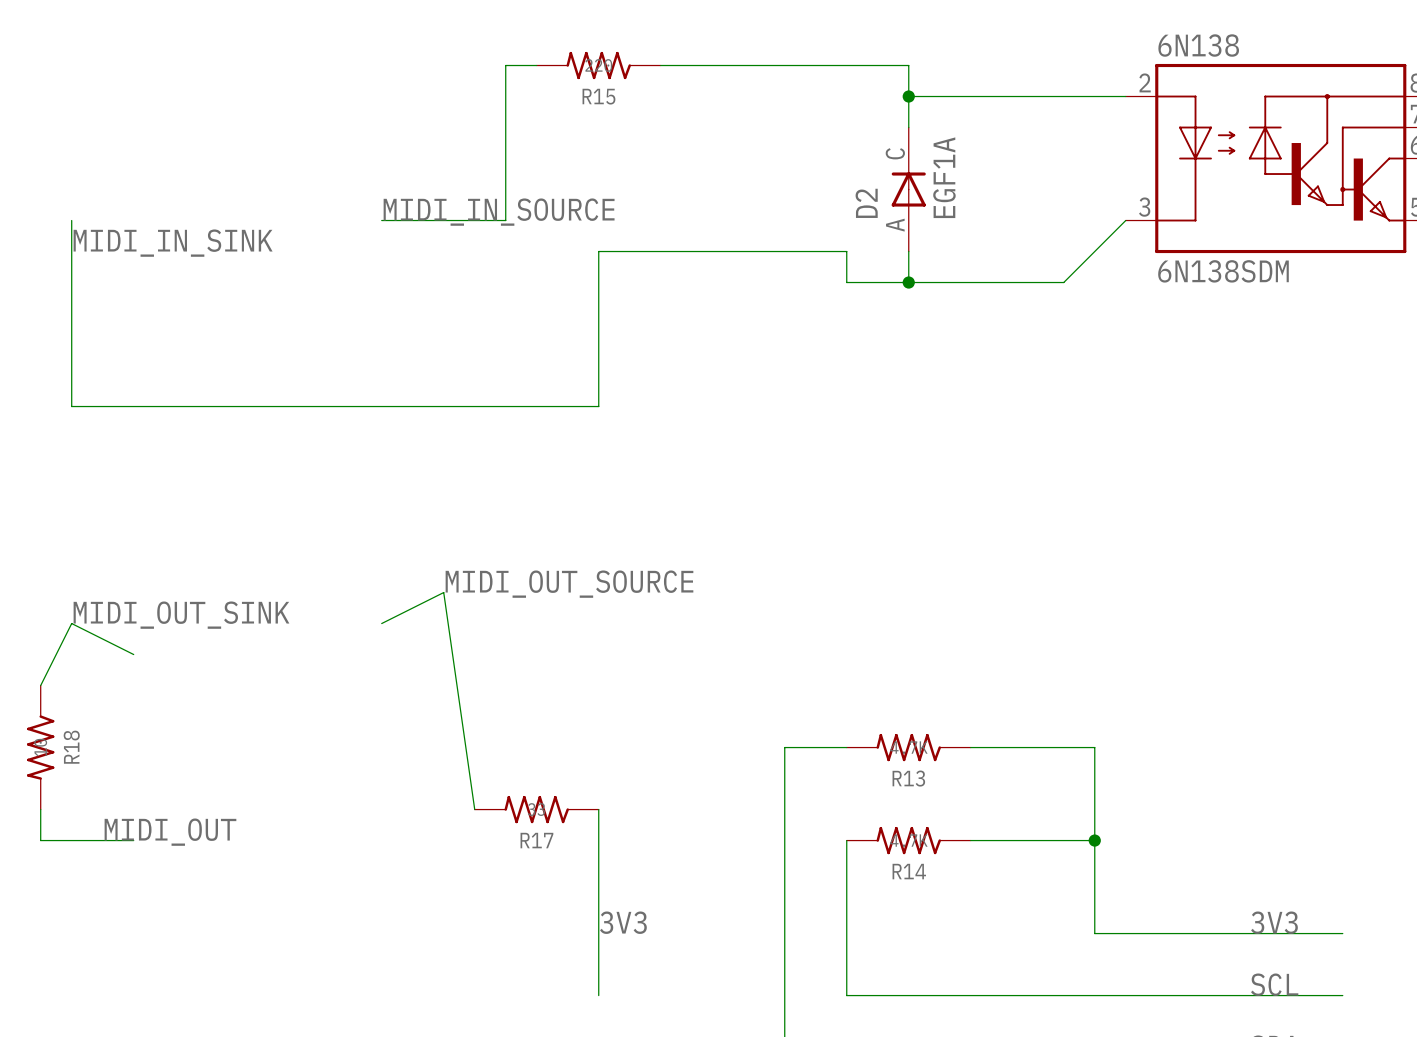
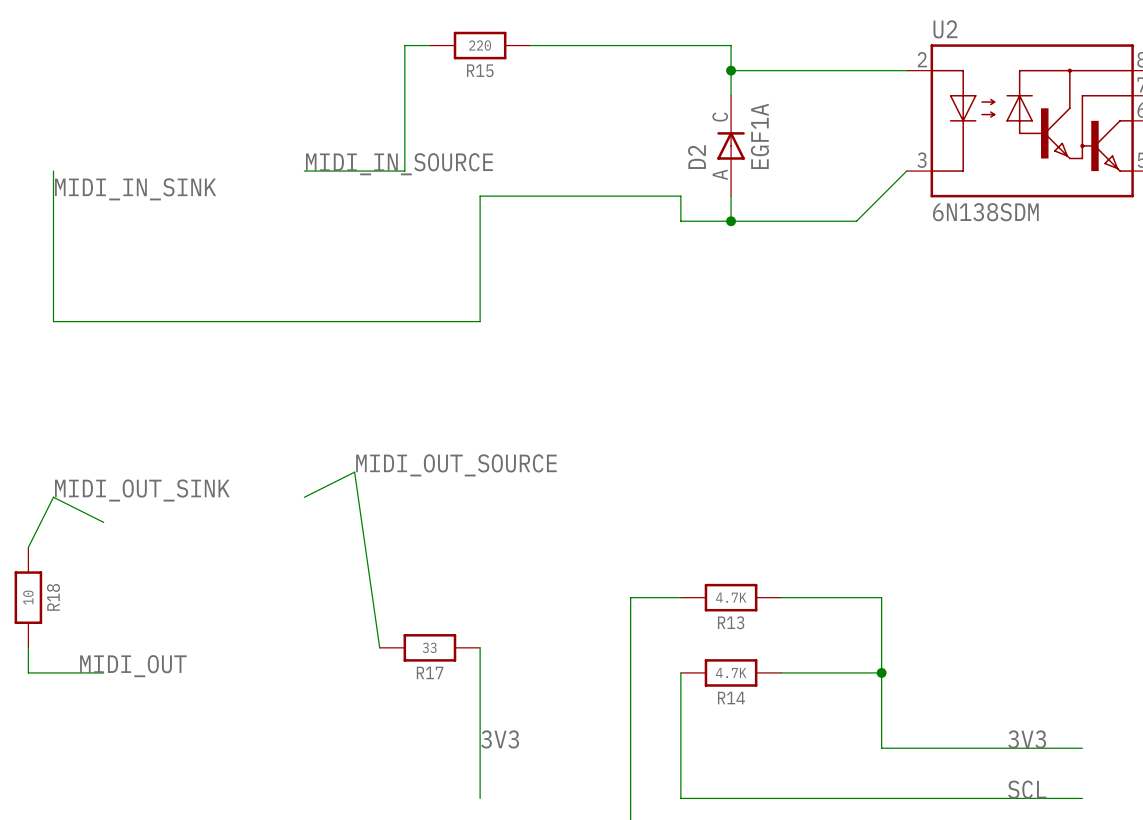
6N138 name: 6N138 (1198, 45) -> U2 (945, 29)
R15 symbol: [536, 51, 661, 80] -> [429, 31, 531, 60]
R18 symbol: [27, 685, 55, 810] -> [14, 547, 43, 648]
R13 symbol: [846, 733, 971, 762] -> [680, 583, 782, 612]
R17 symbol: [474, 795, 599, 824] -> [379, 634, 481, 662]
R14 symbol: [846, 826, 971, 855] -> [680, 659, 782, 687]

